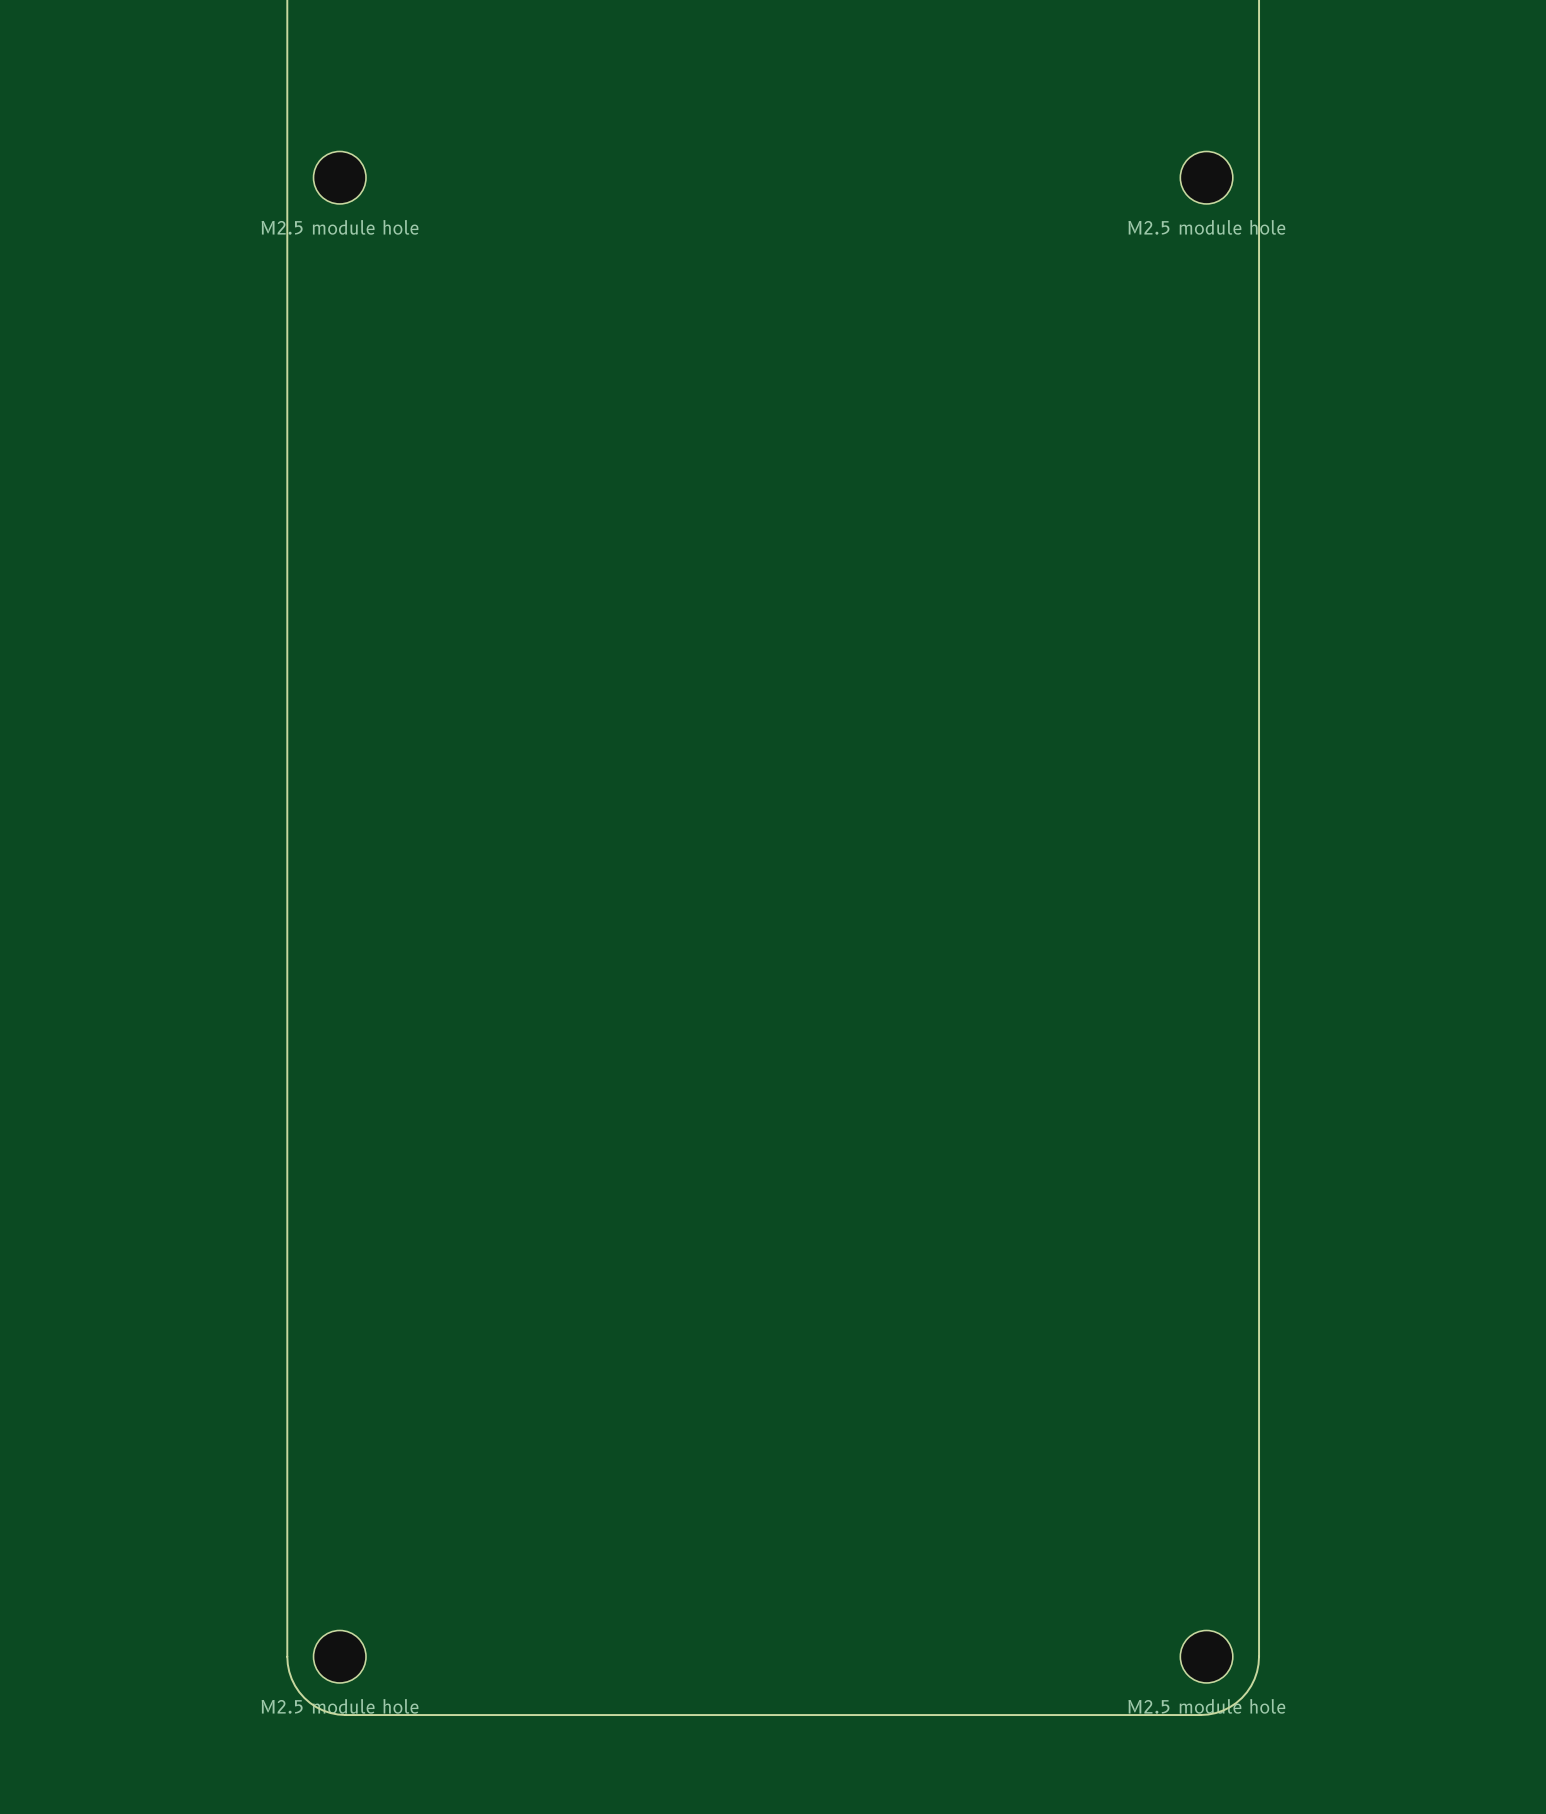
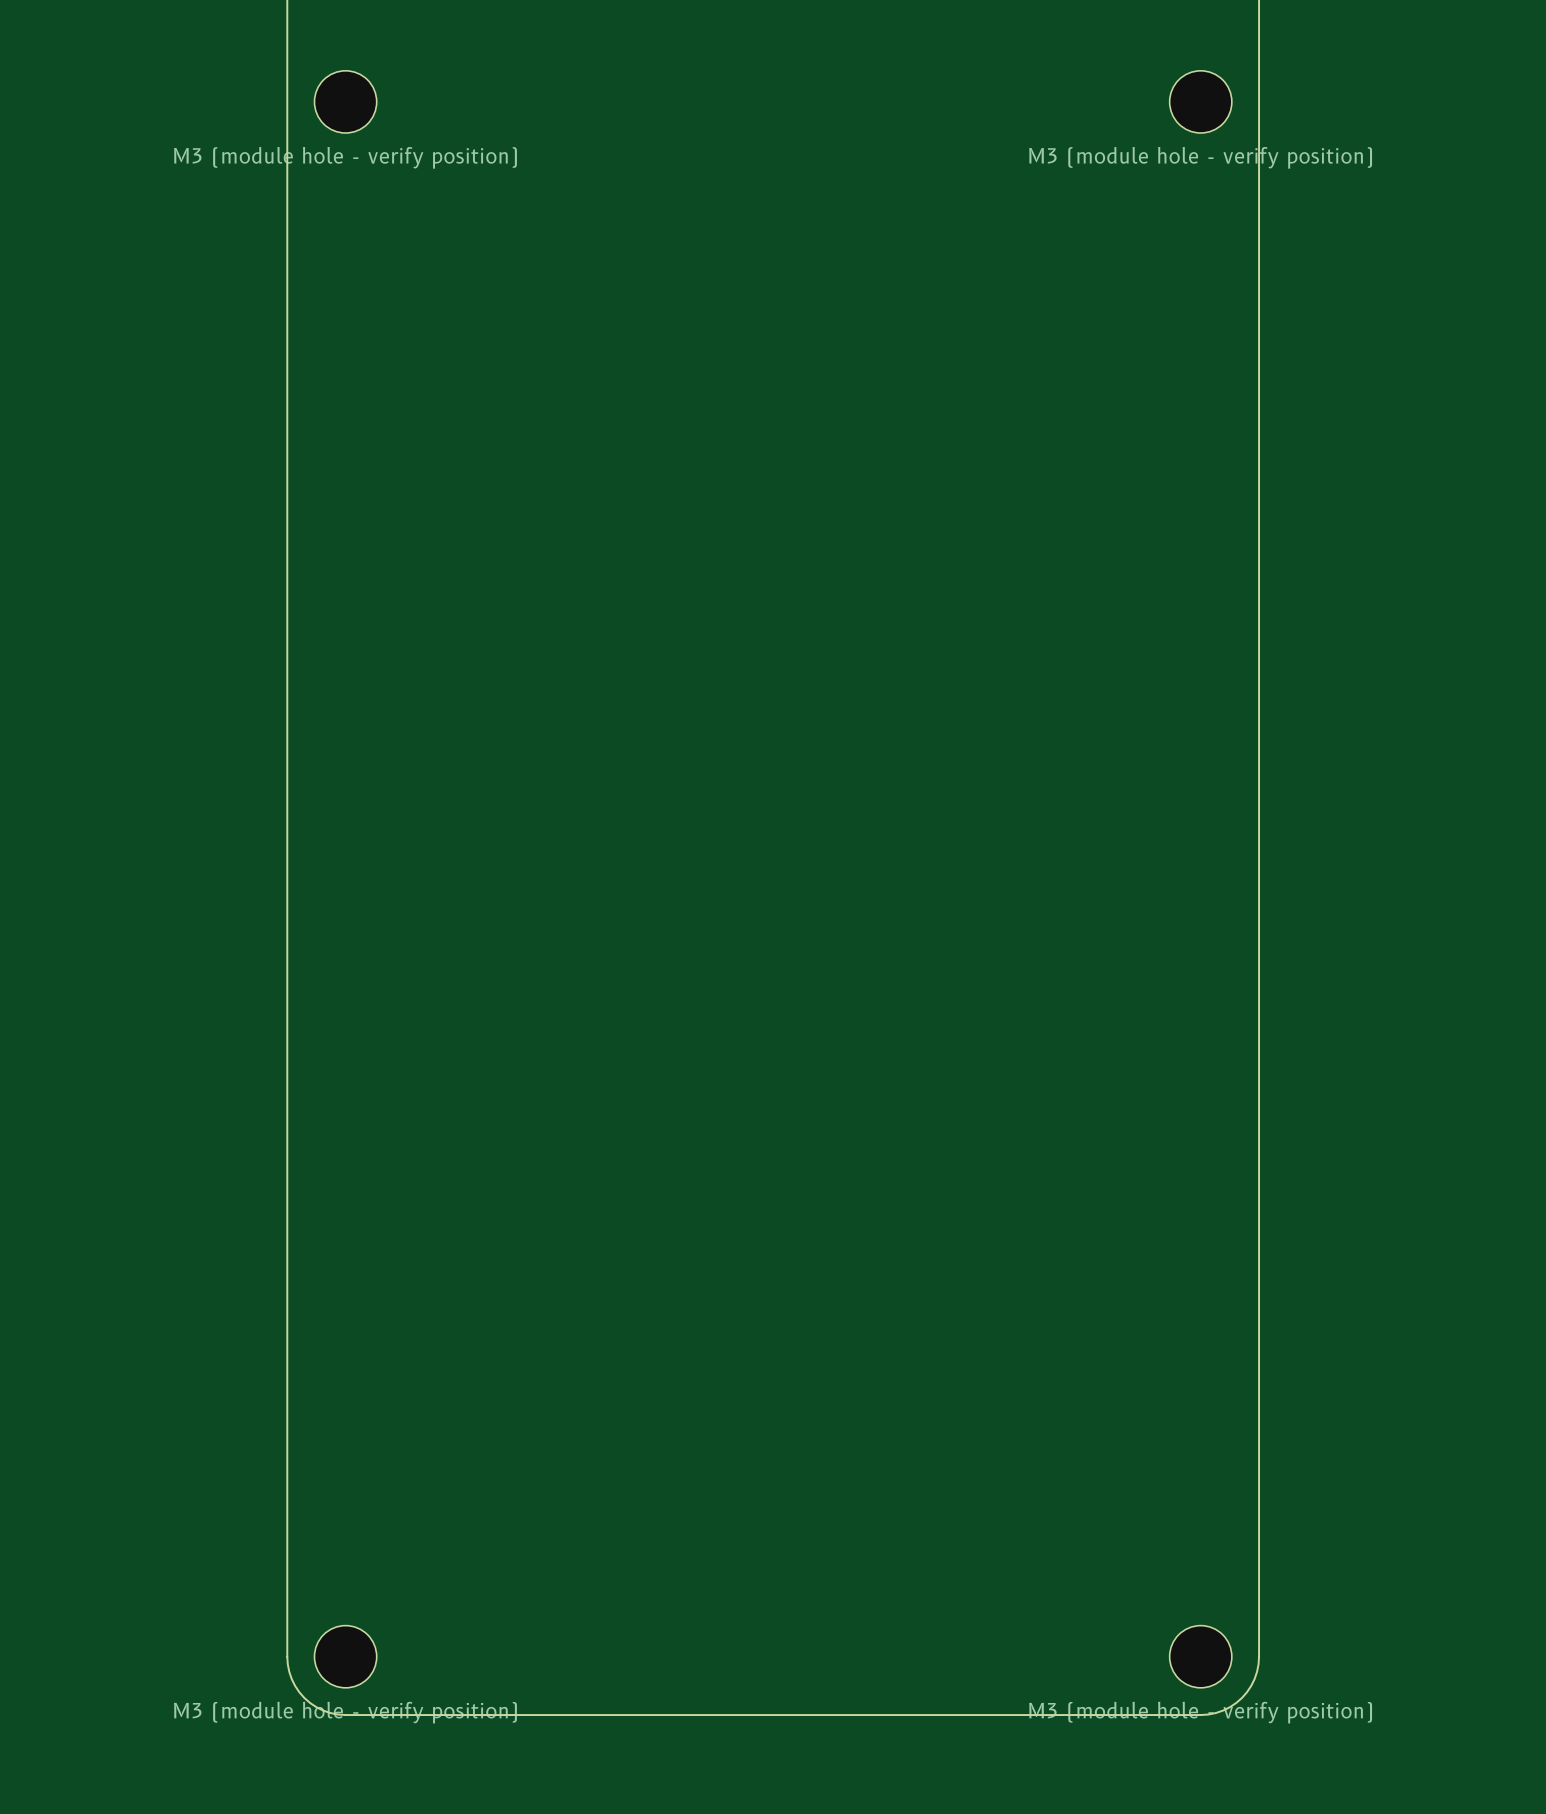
part: none -> M3 (module hole - verify position) (345, 101)
part: none -> M3 (module hole - verify position) (1200, 101)
part: M2.5 module hole (339, 177) -> none
part: M2.5 module hole (1206, 177) -> none
part footprint: [313, 1630, 367, 1683] -> [314, 1625, 377, 1688]
part footprint: [1180, 1630, 1233, 1683] -> [1169, 1625, 1232, 1688]
part value: M2.5 module hole (340, 1706) -> M3 (module hole - verify position) (345, 1712)
part value: M2.5 module hole (1206, 1706) -> M3 (module hole - verify position) (1200, 1712)

